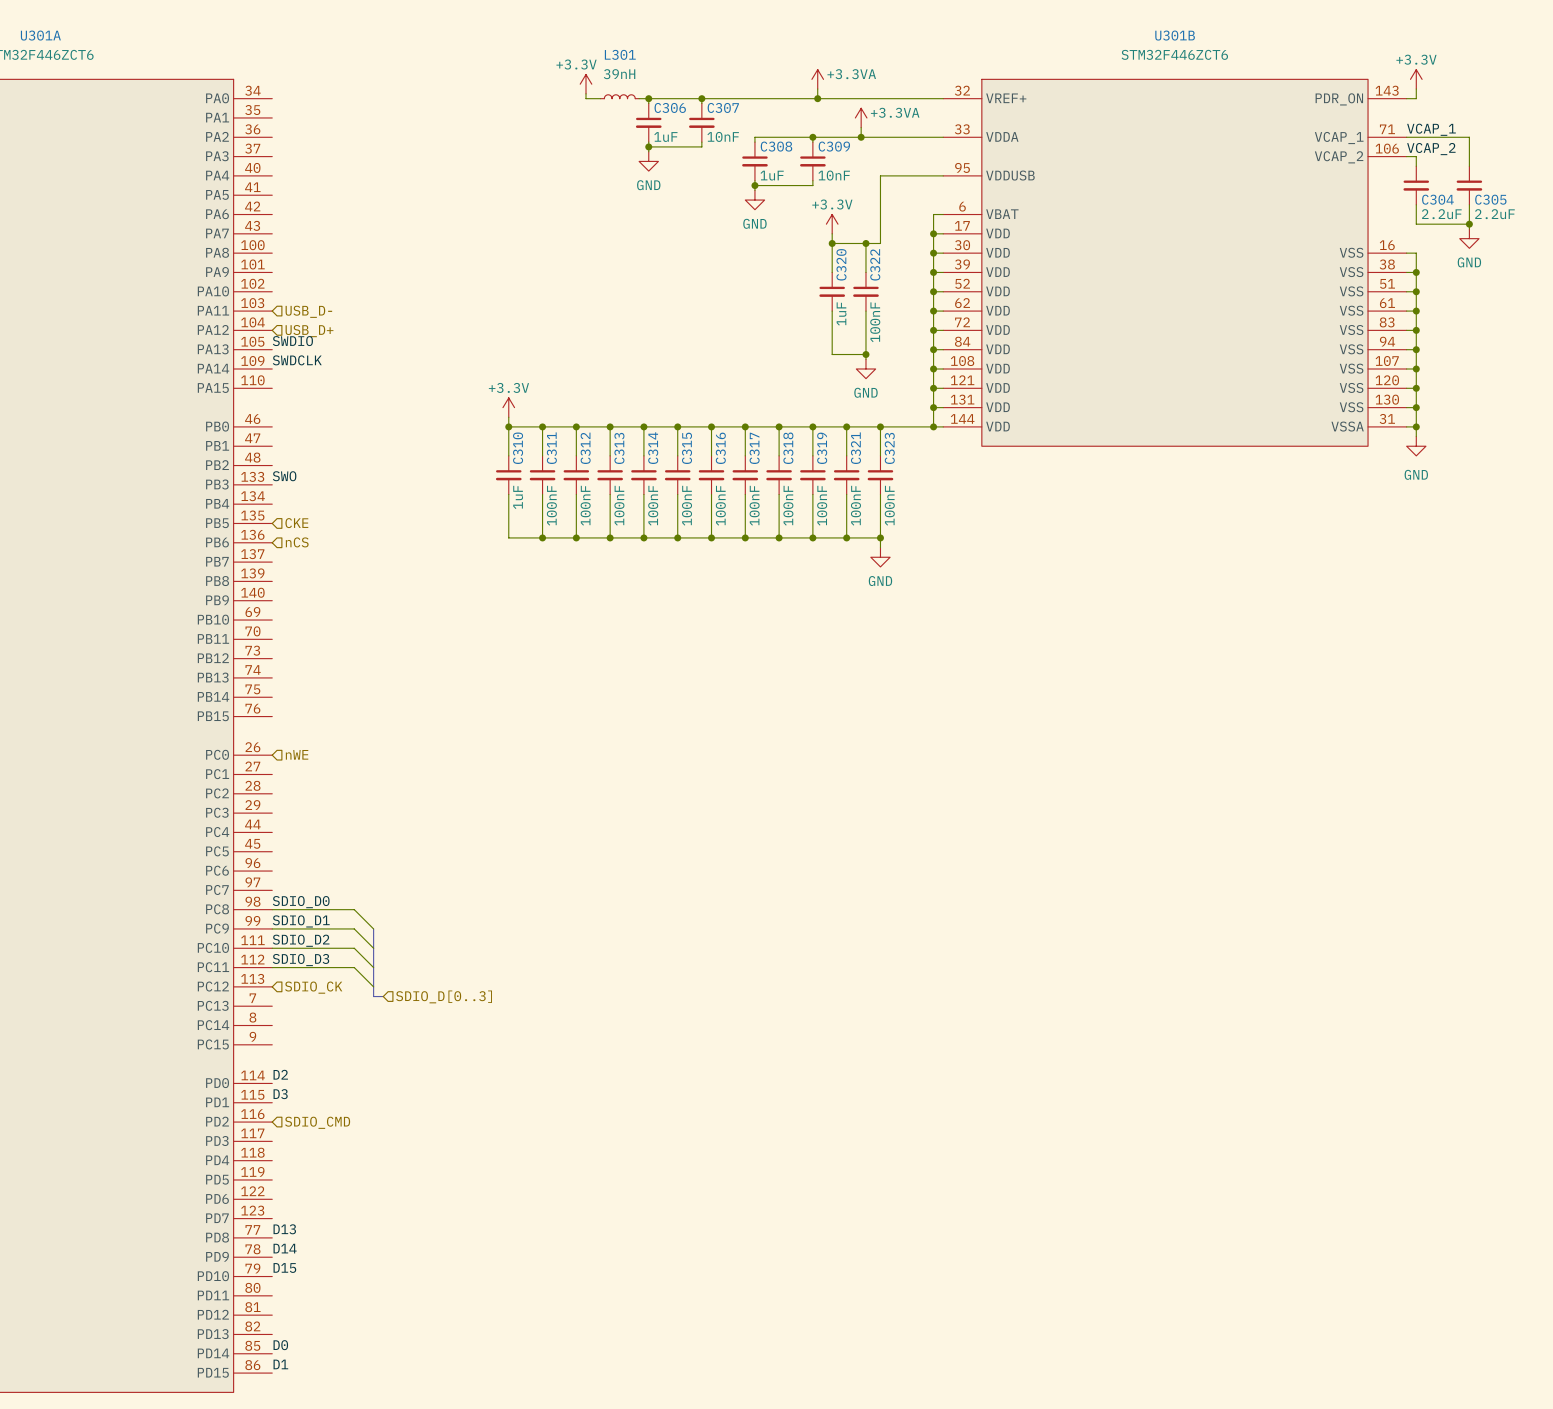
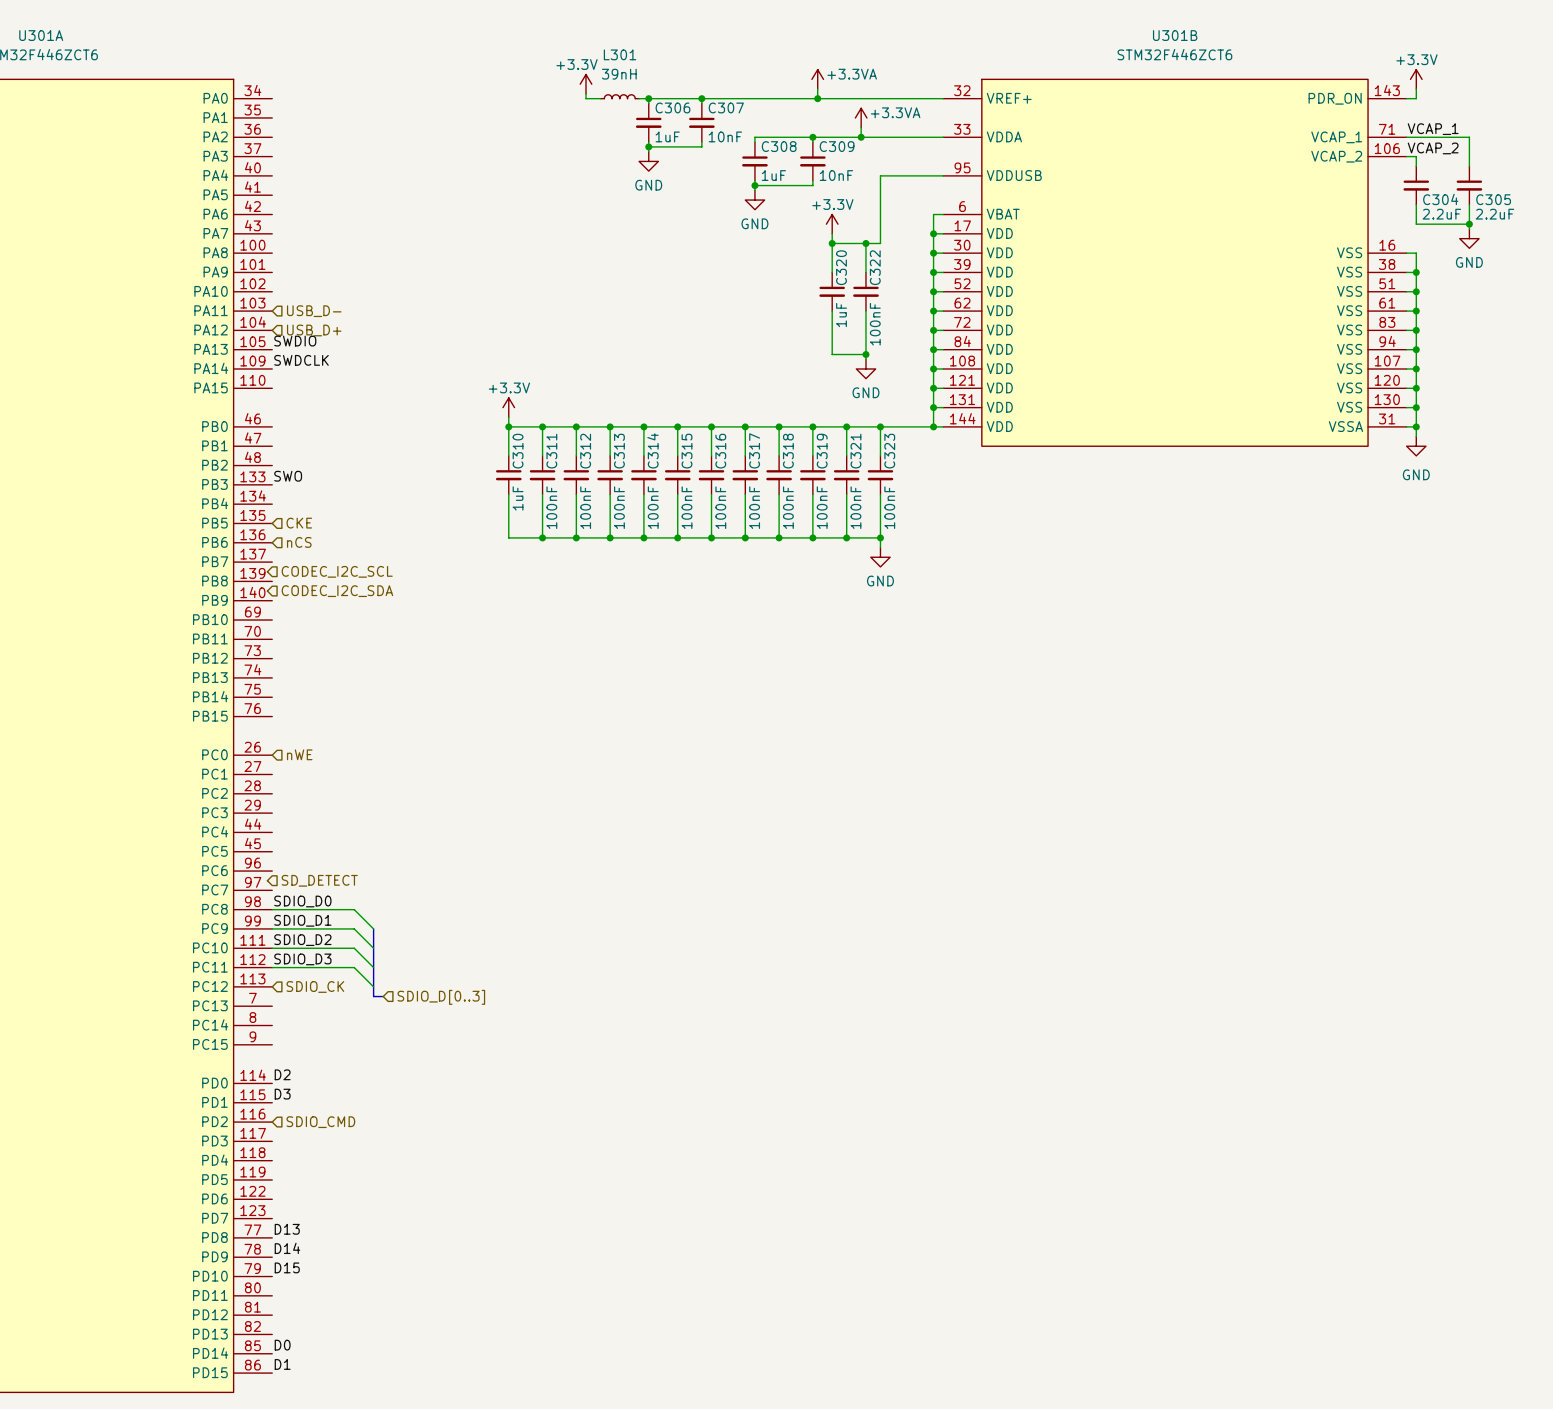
hierarchical label: none -> CODEC_I2C_SCL (337, 571)
hierarchical label: none -> CODEC_I2C_SDA (337, 591)
hierarchical label: none -> SD_DETECT (319, 880)

